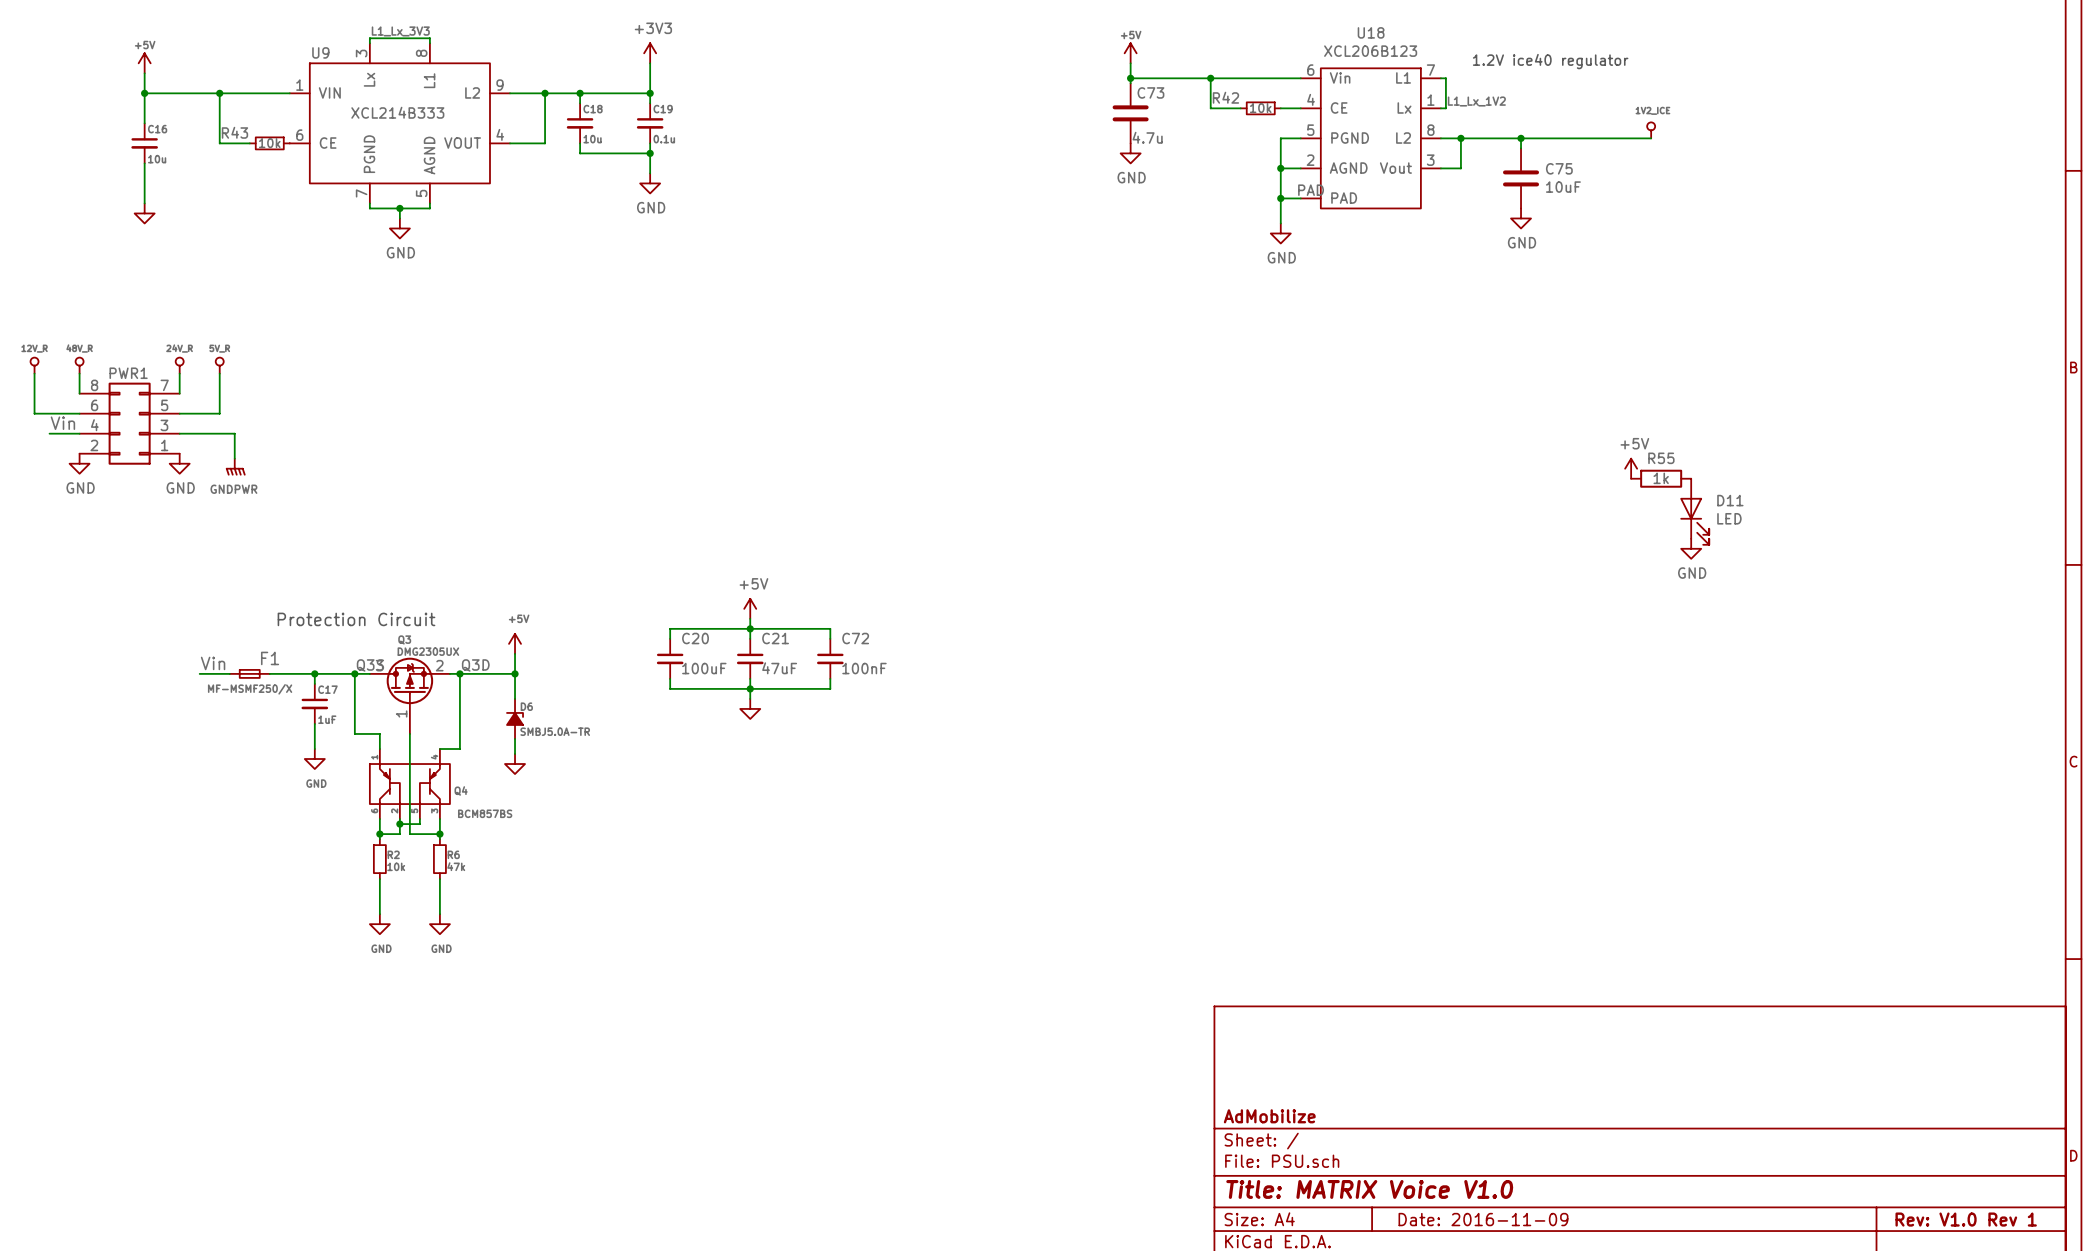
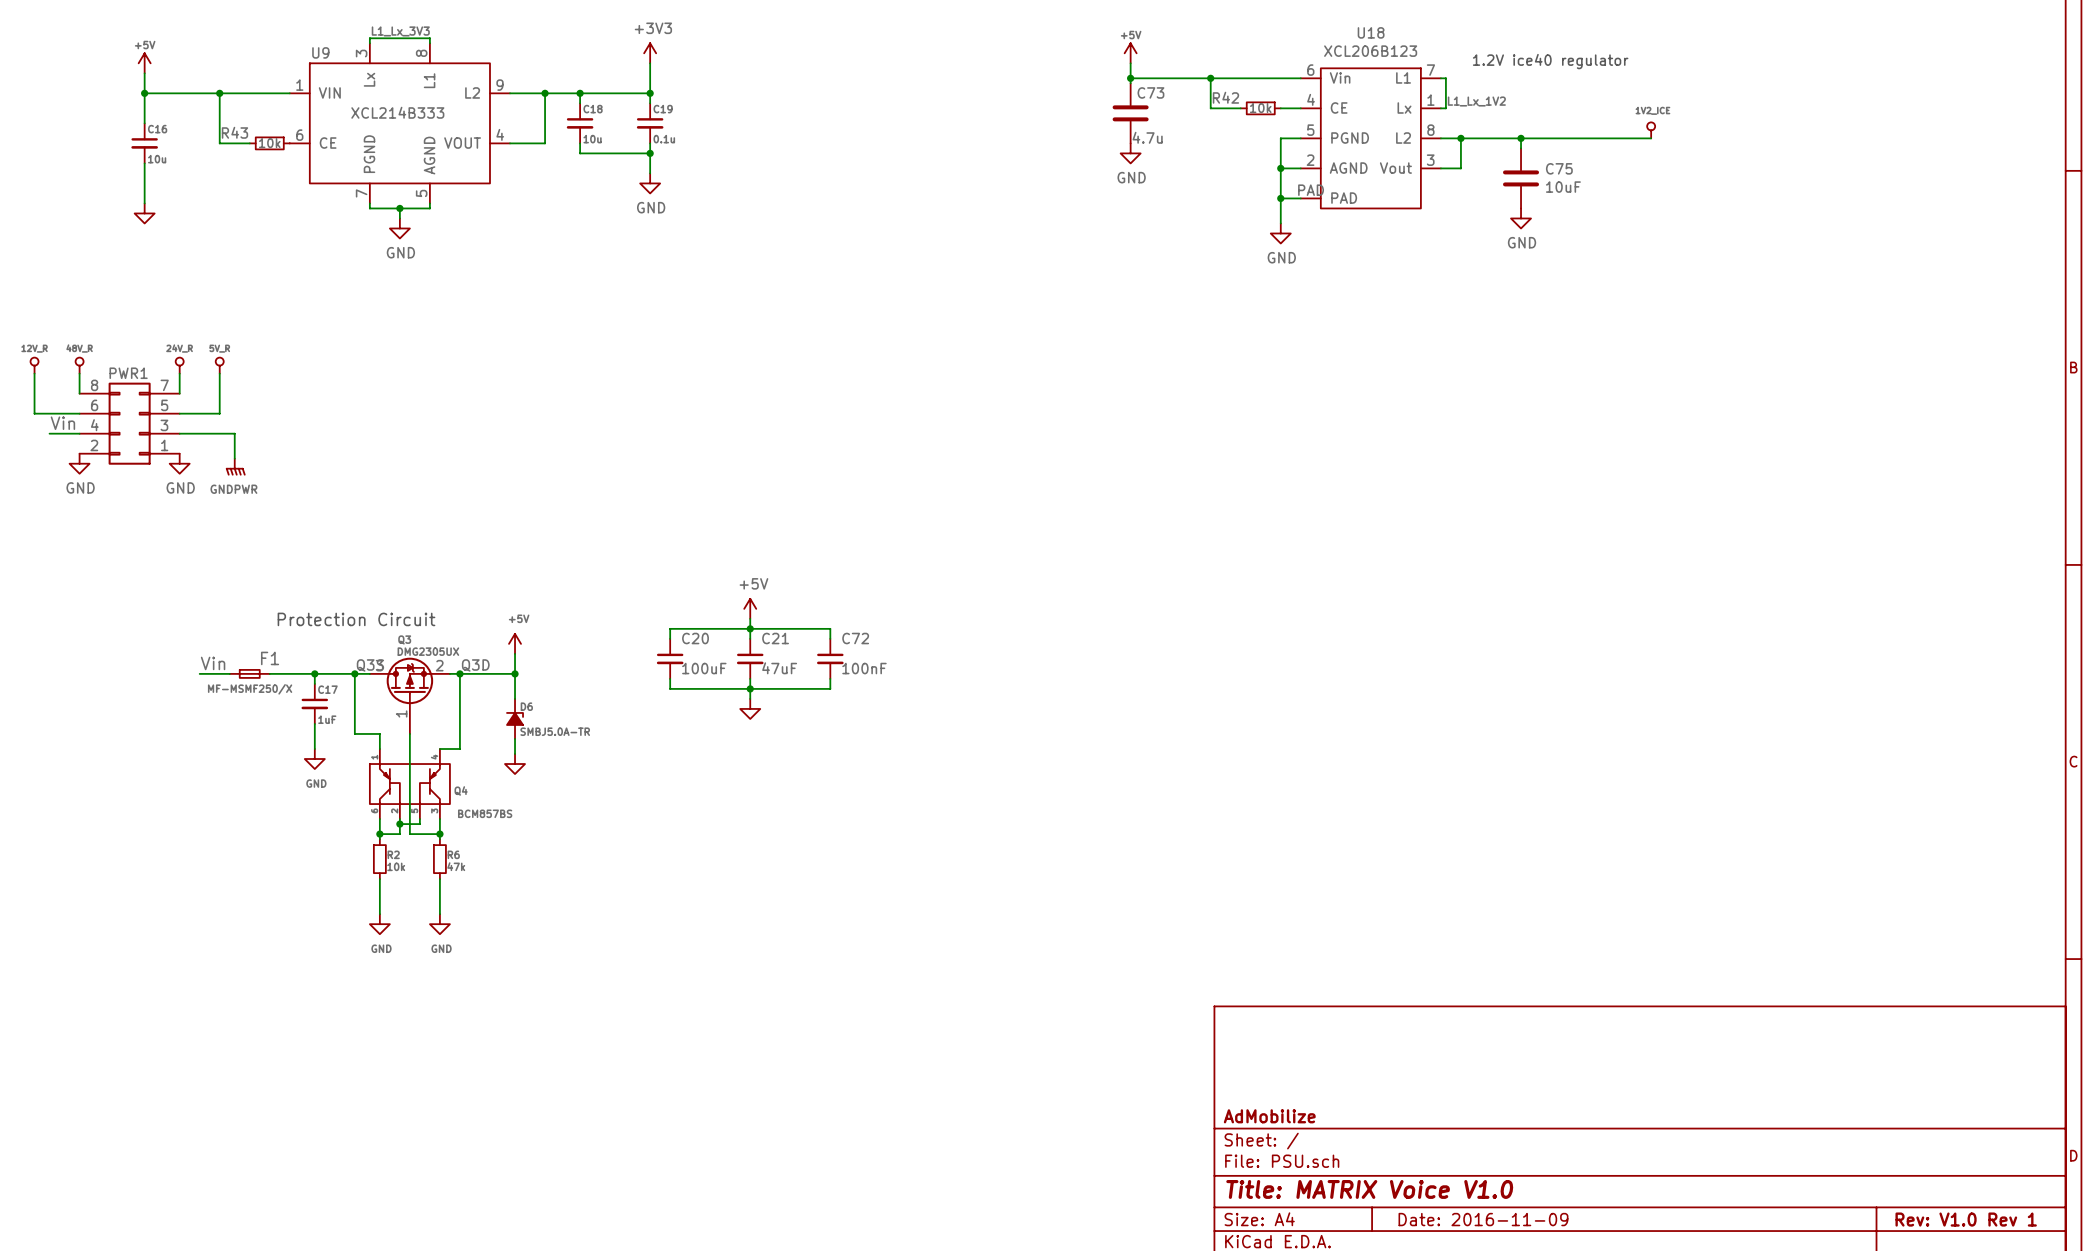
power symbol: +5V (1631, 468) -> none
R55: 1k (1661, 478) -> none
D11: LED (1694, 511) -> none
power symbol: GND (1691, 548) -> none

